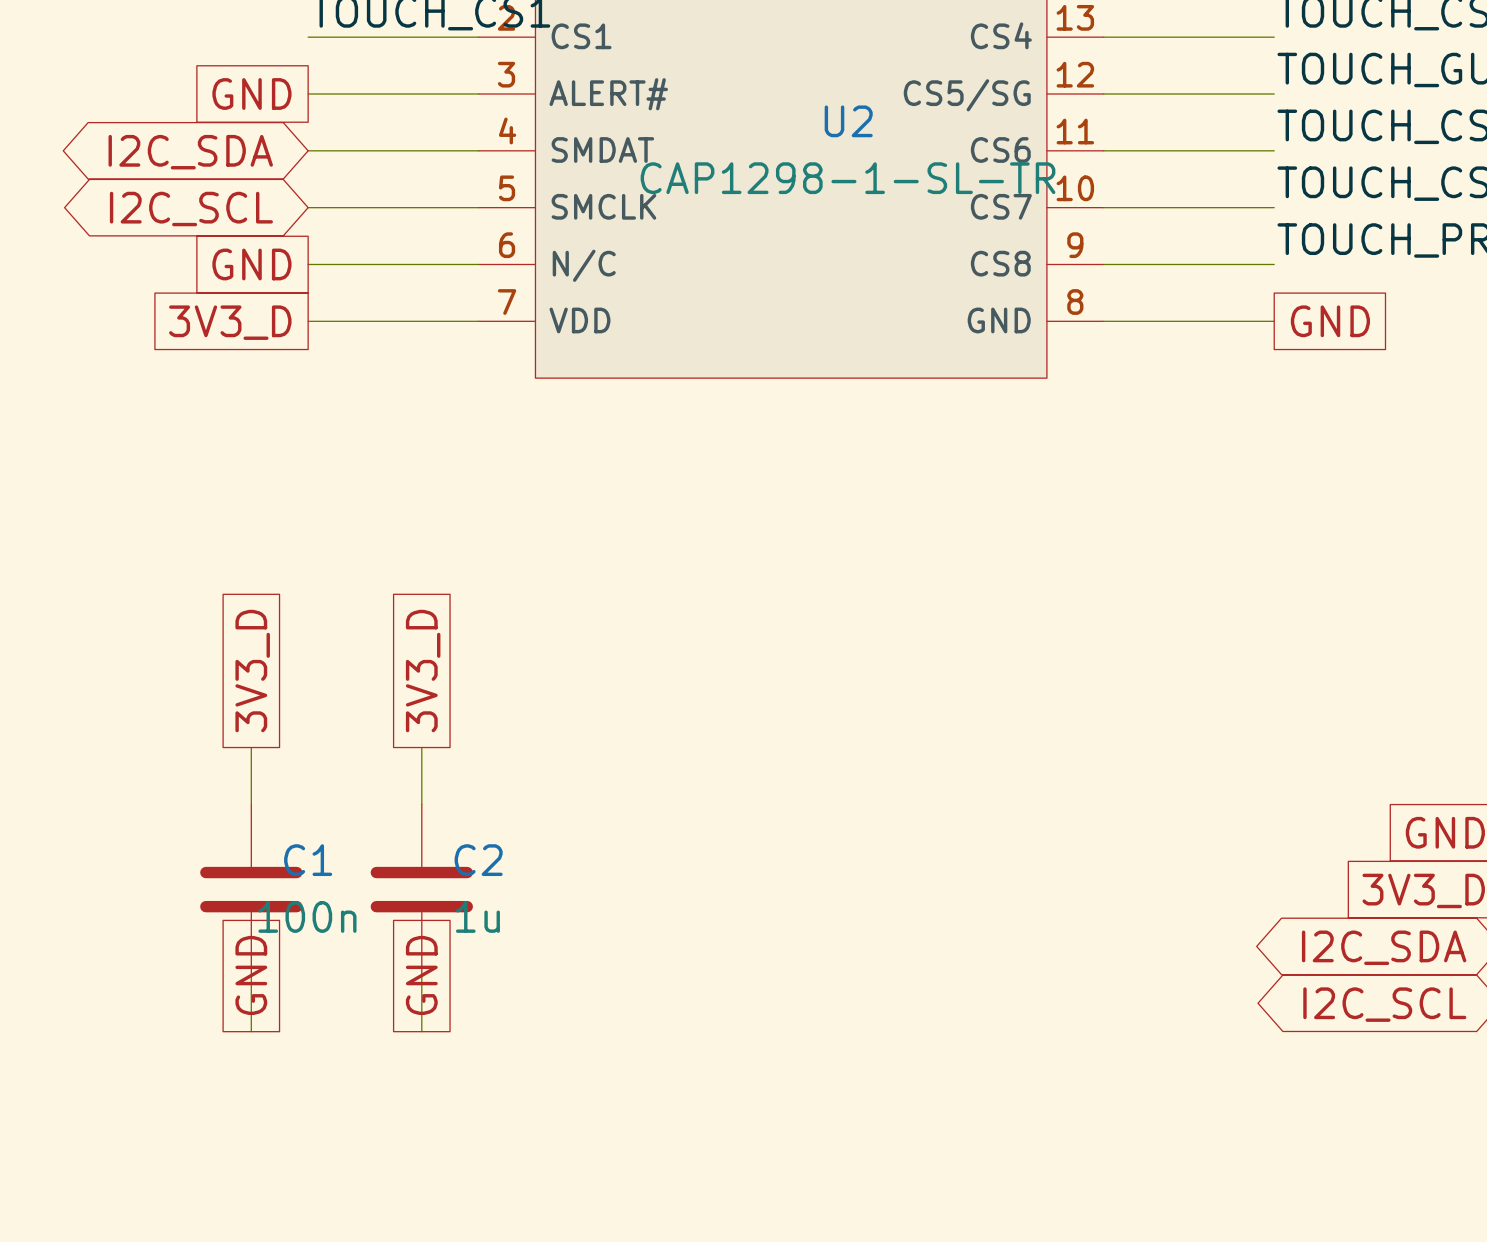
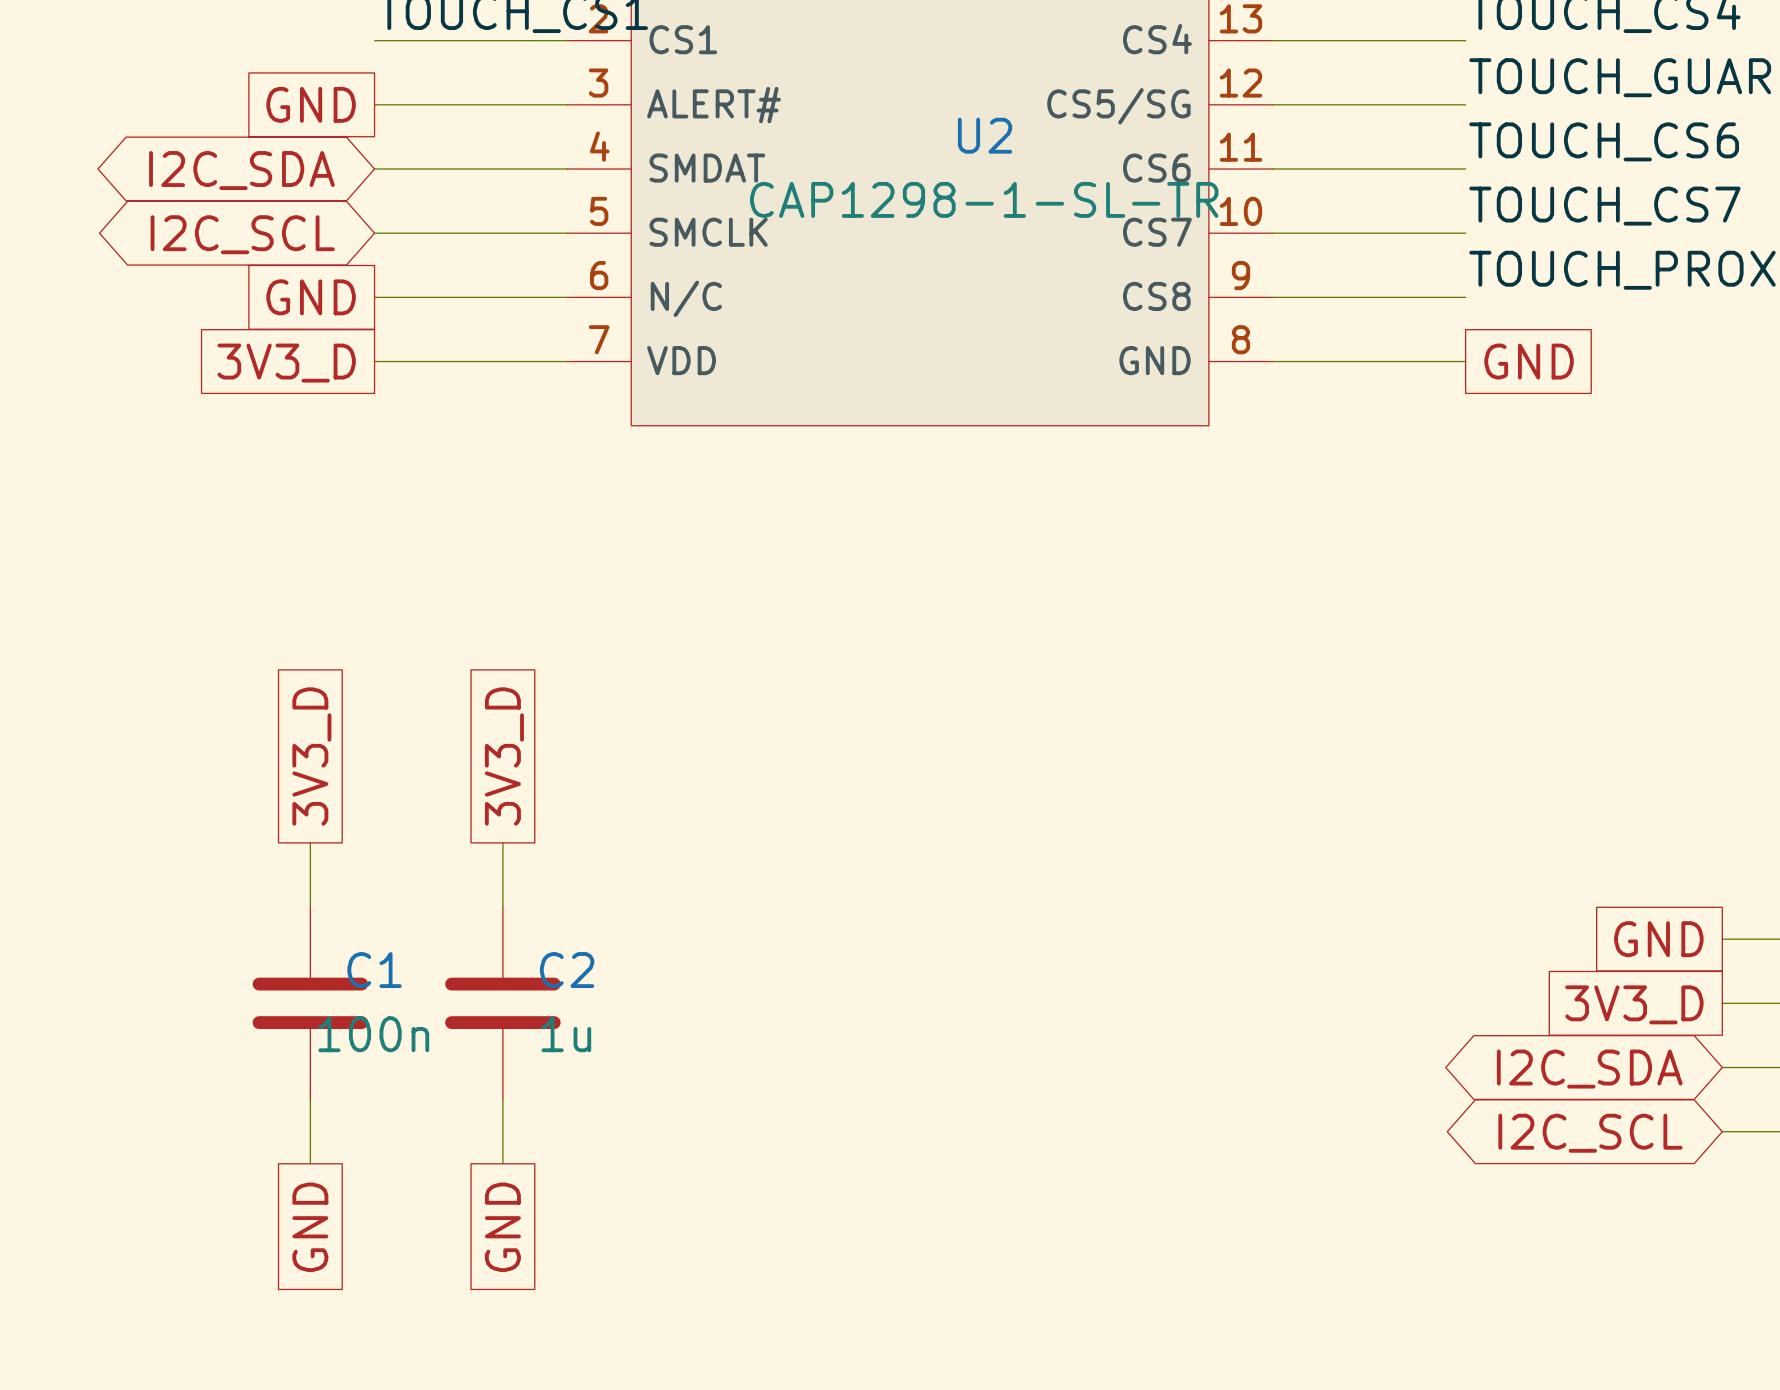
global label rotation: 0° (251, 975) -> 180° (310, 1227)
global label position: GND (251, 975) -> GND (310, 1227)
global label rotation: 0° (421, 975) -> 180° (502, 1227)
global label position: GND (421, 975) -> GND (502, 1227)

